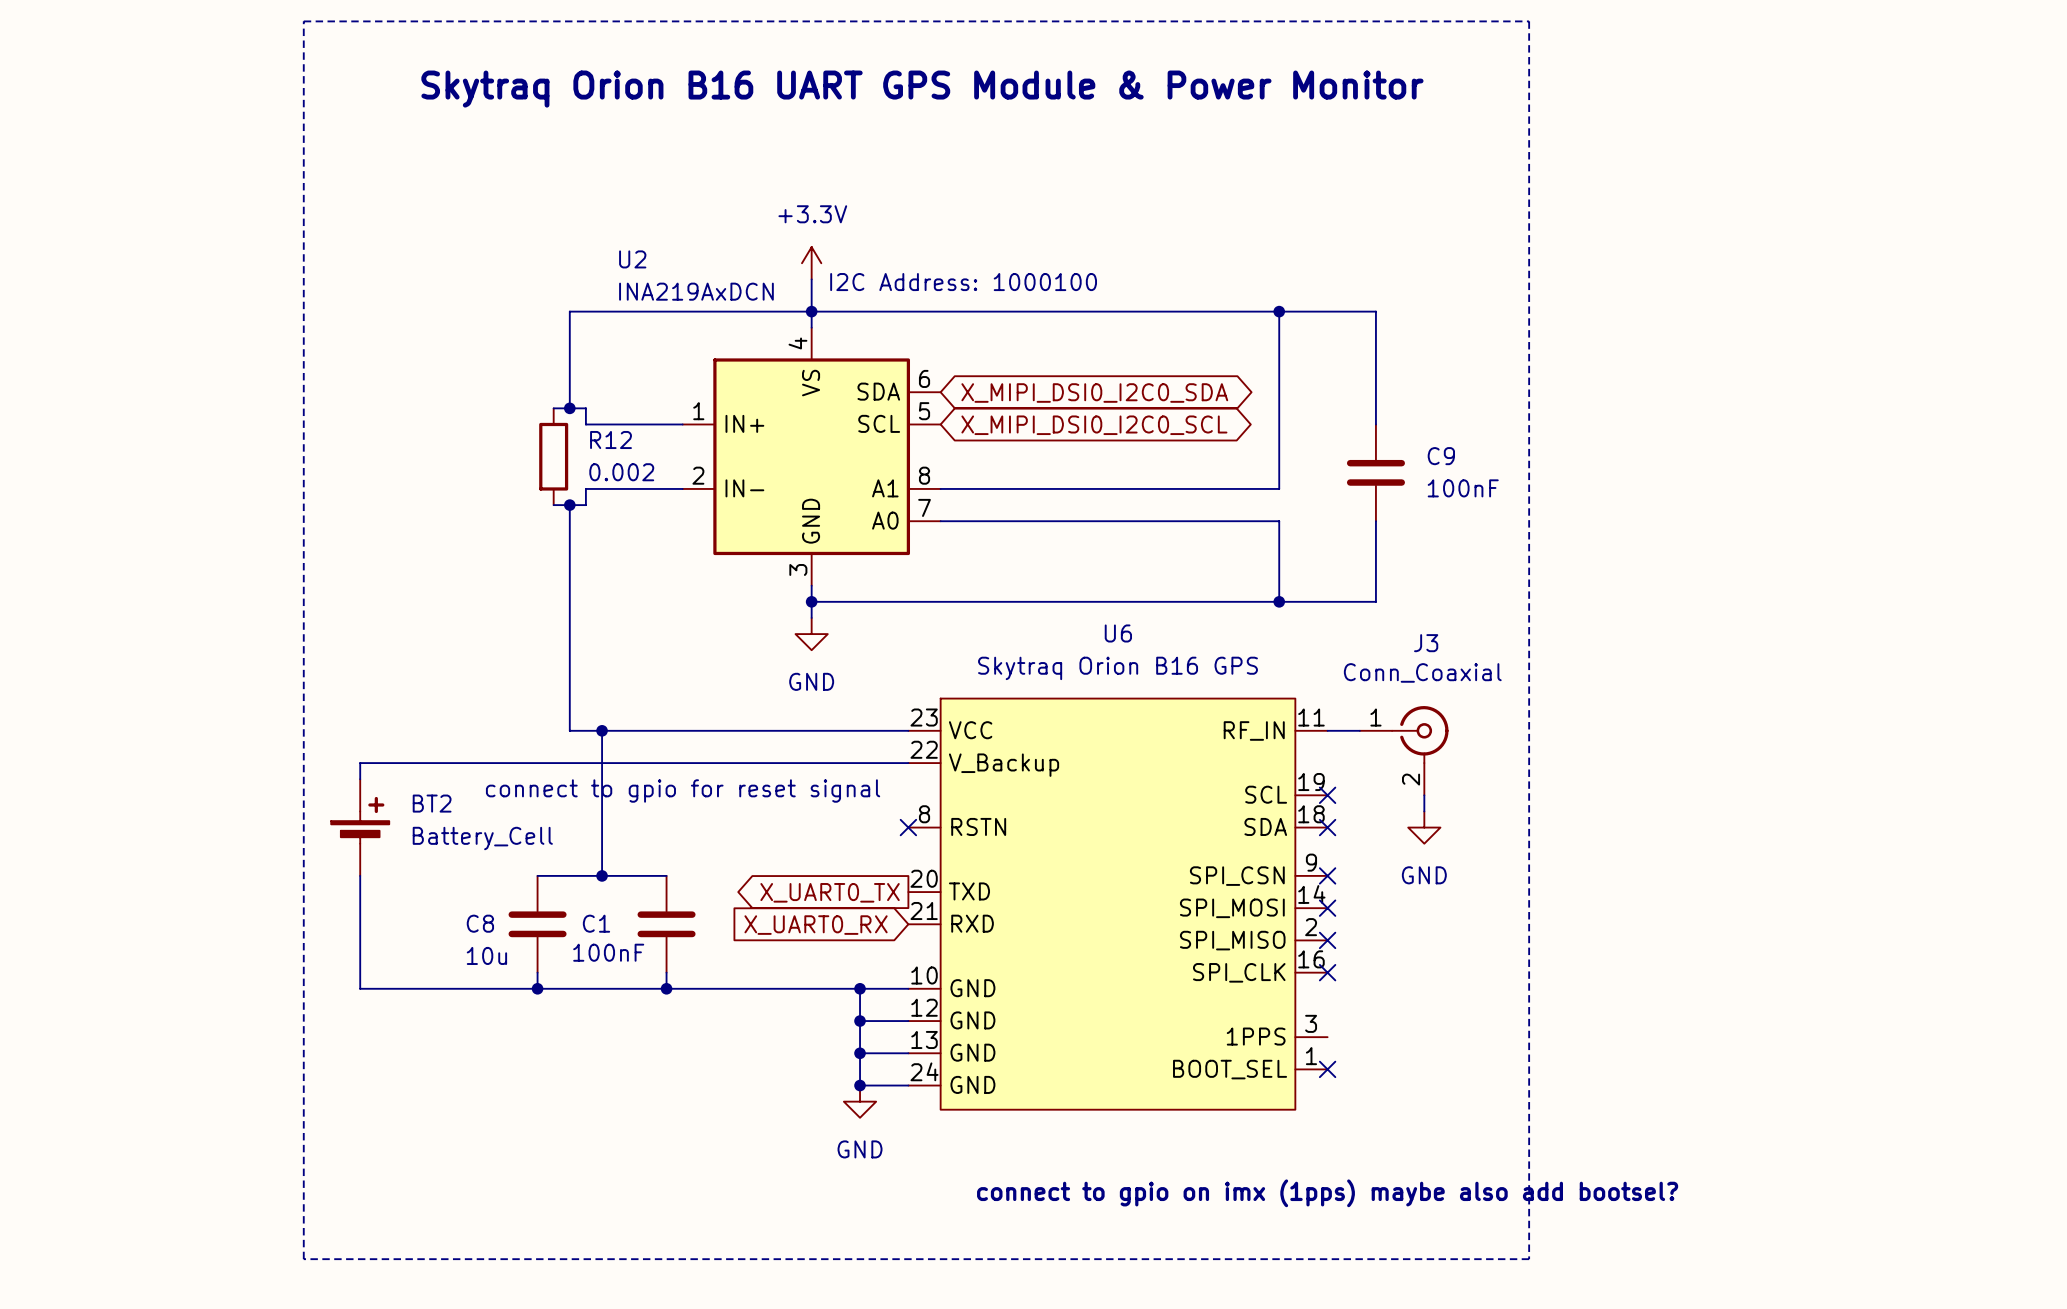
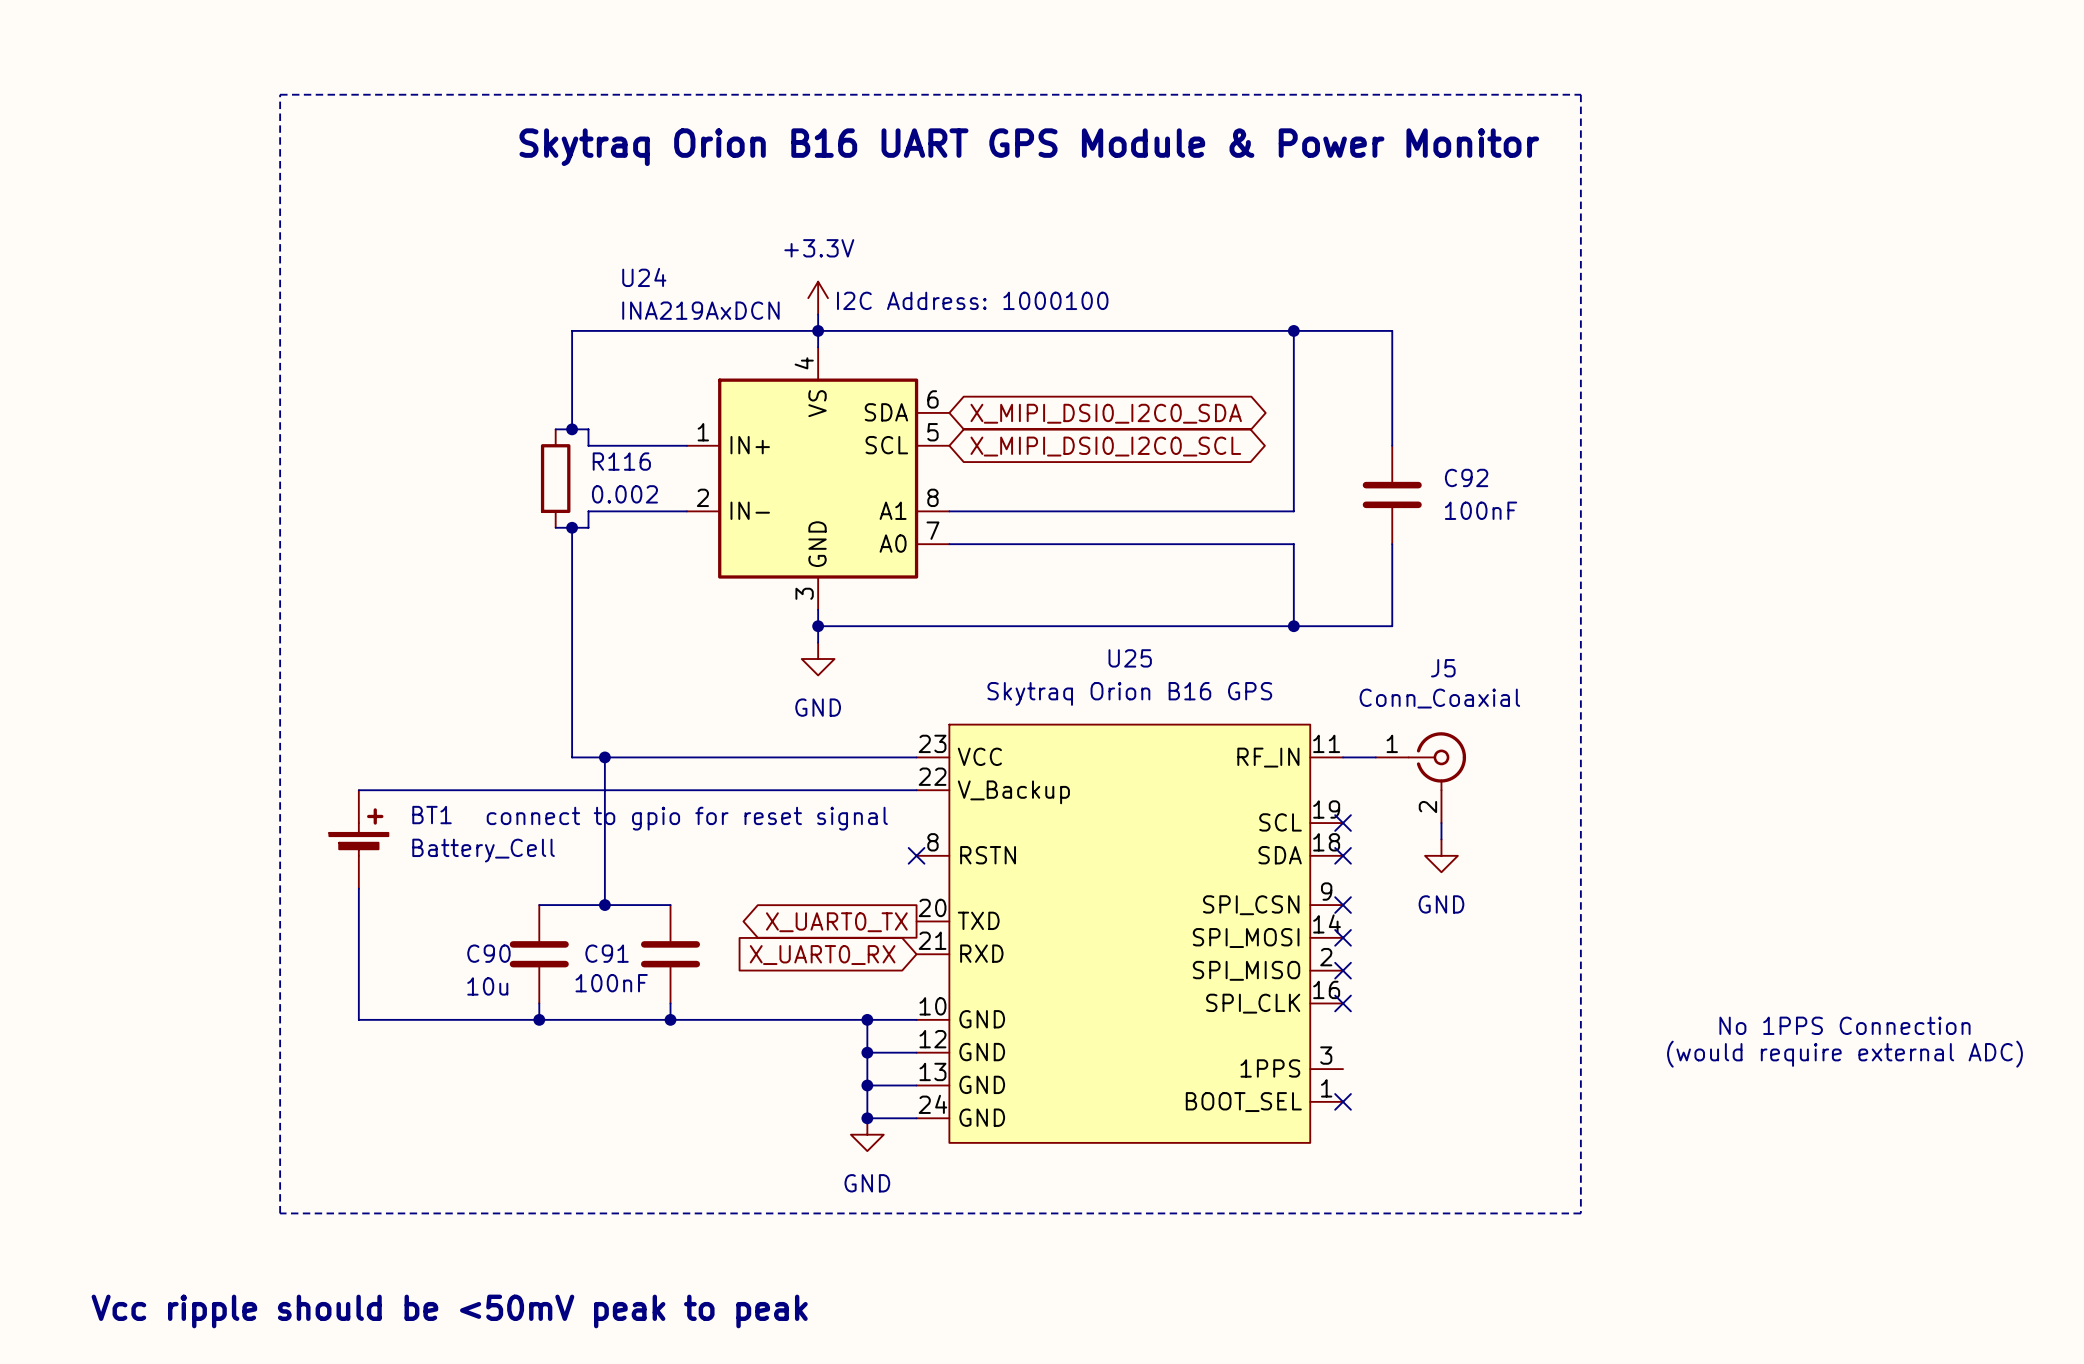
line: (303, 21) (1529, 21) (1529, 1259) (303, 1259) (303, 21) -> (280, 94) (280, 1213) (1580, 1213) (1580, 94) (280, 94)
text position: Skytraq Orion B16 UART GPS Module & Power Monitor (922, 89) -> Skytraq Orion B16 UART GPS Module & Power Monitor (1029, 147)
U2 name: U2 (632, 259) -> U24 (644, 277)
power symbol position: +3.3V (811, 263) -> +3.3V (818, 298)
R12 name: R12 (611, 440) -> R116 (621, 461)
C9 name: C9 (1441, 456) -> C92 (1466, 477)
U6 name: U6 (1118, 633) -> U25 (1130, 658)
J3 name: J3 (1426, 643) -> J5 (1443, 668)
BT1: none -> Battery_Cell (358, 839)
BT2: Battery_Cell (360, 827) -> none
C8 name: C8 (480, 923) -> C90 (488, 953)
C1 name: C1 (596, 923) -> C91 (607, 953)
text: none -> No 1PPS Connection (1844, 1025)
text: none -> (would require external ADC) (1844, 1054)
text: connect to gpio on imx (1pps) maybe also add bootsel? (1327, 1193) -> none
text: none -> Vcc ripple should be <50mV peak to peak (449, 1311)

